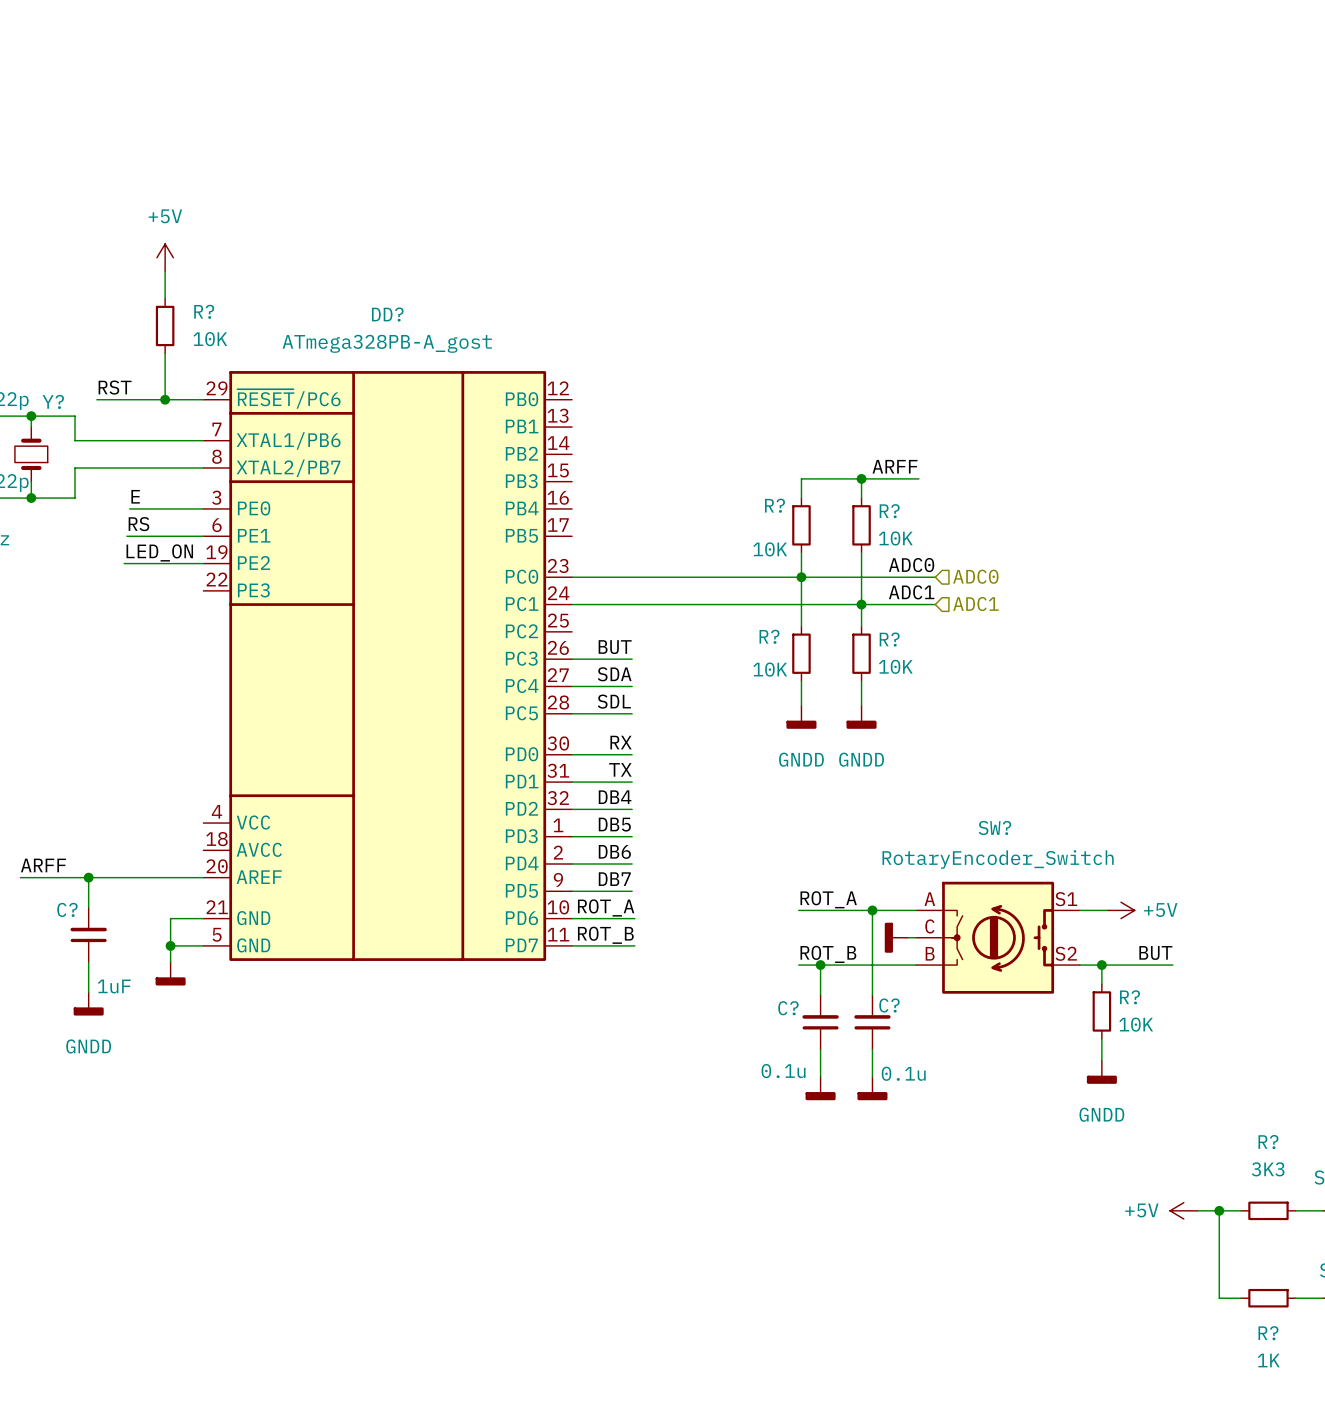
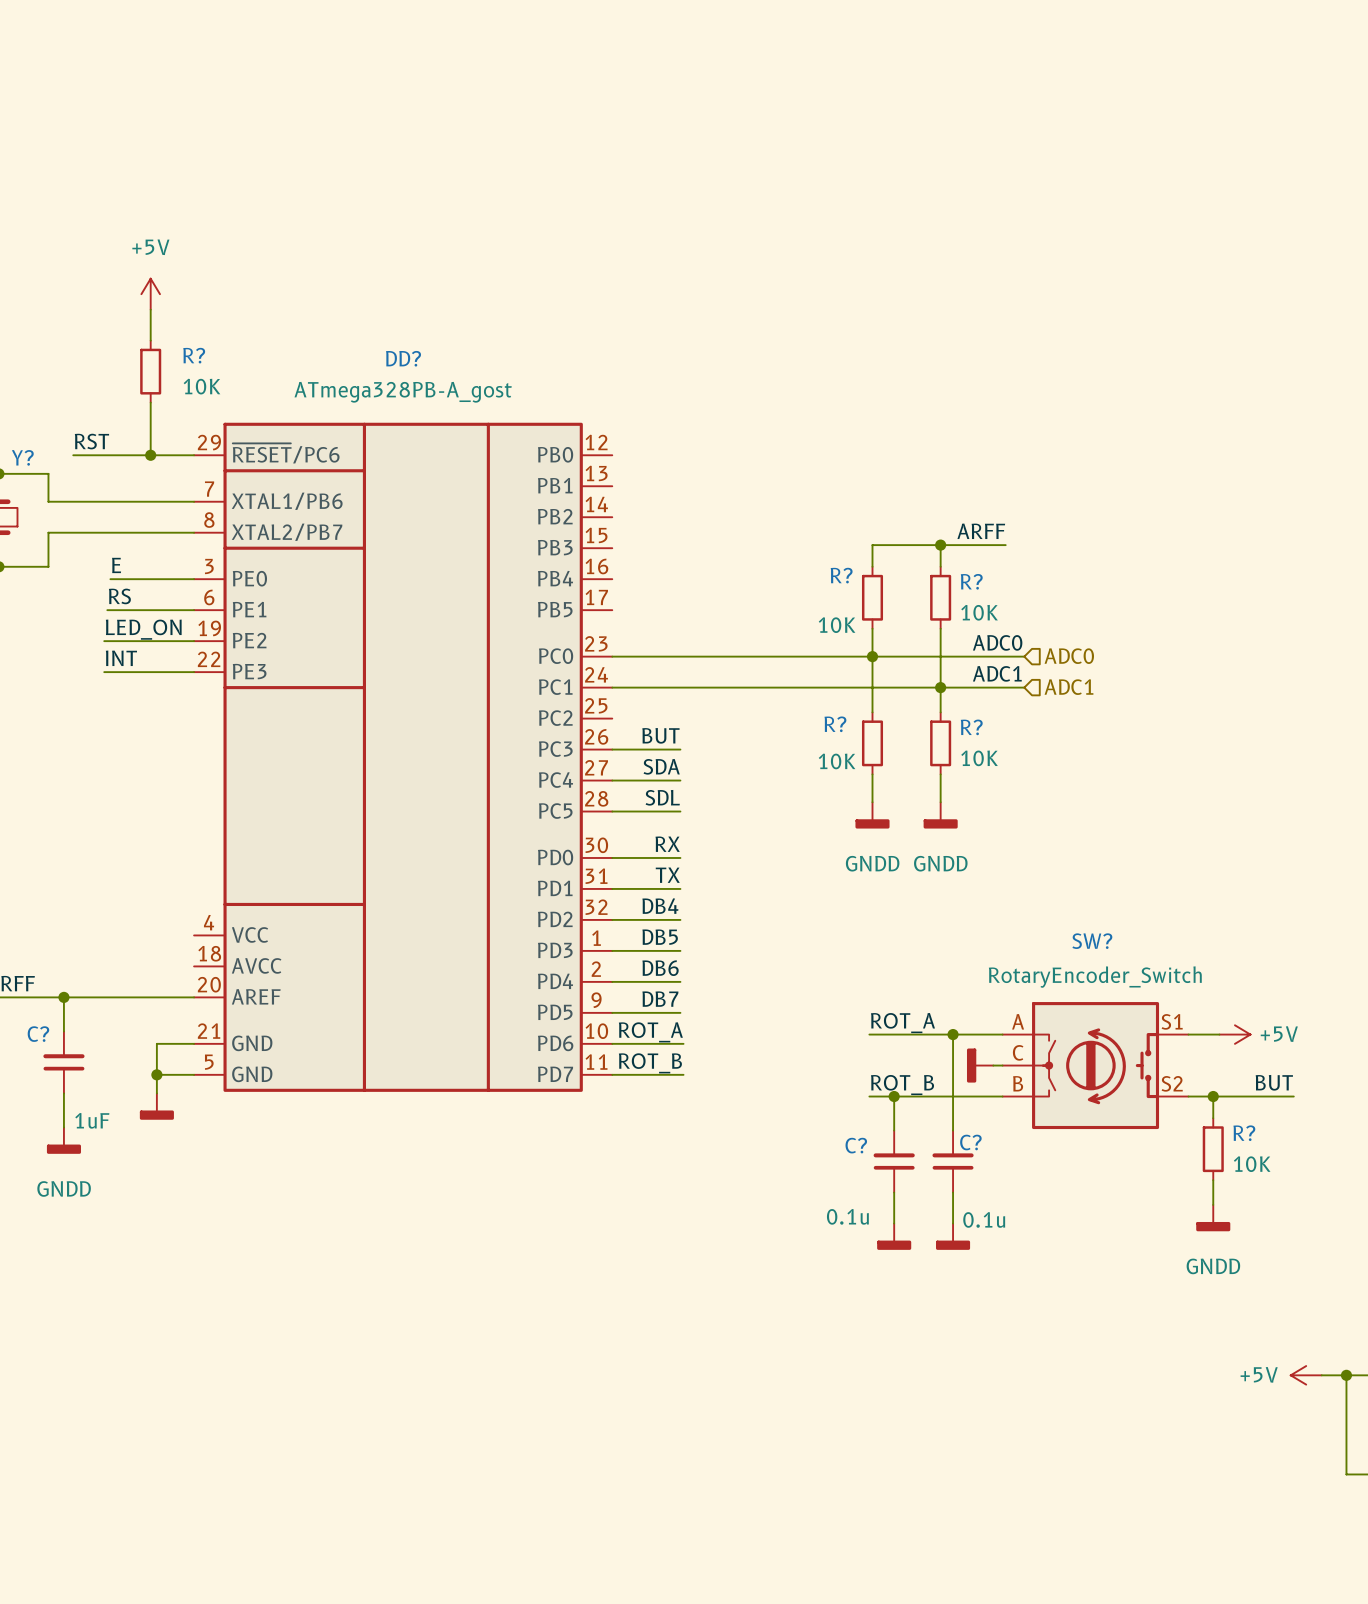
label: none -> INT (121, 658)
wire: none -> (104, 672) (194, 672)

